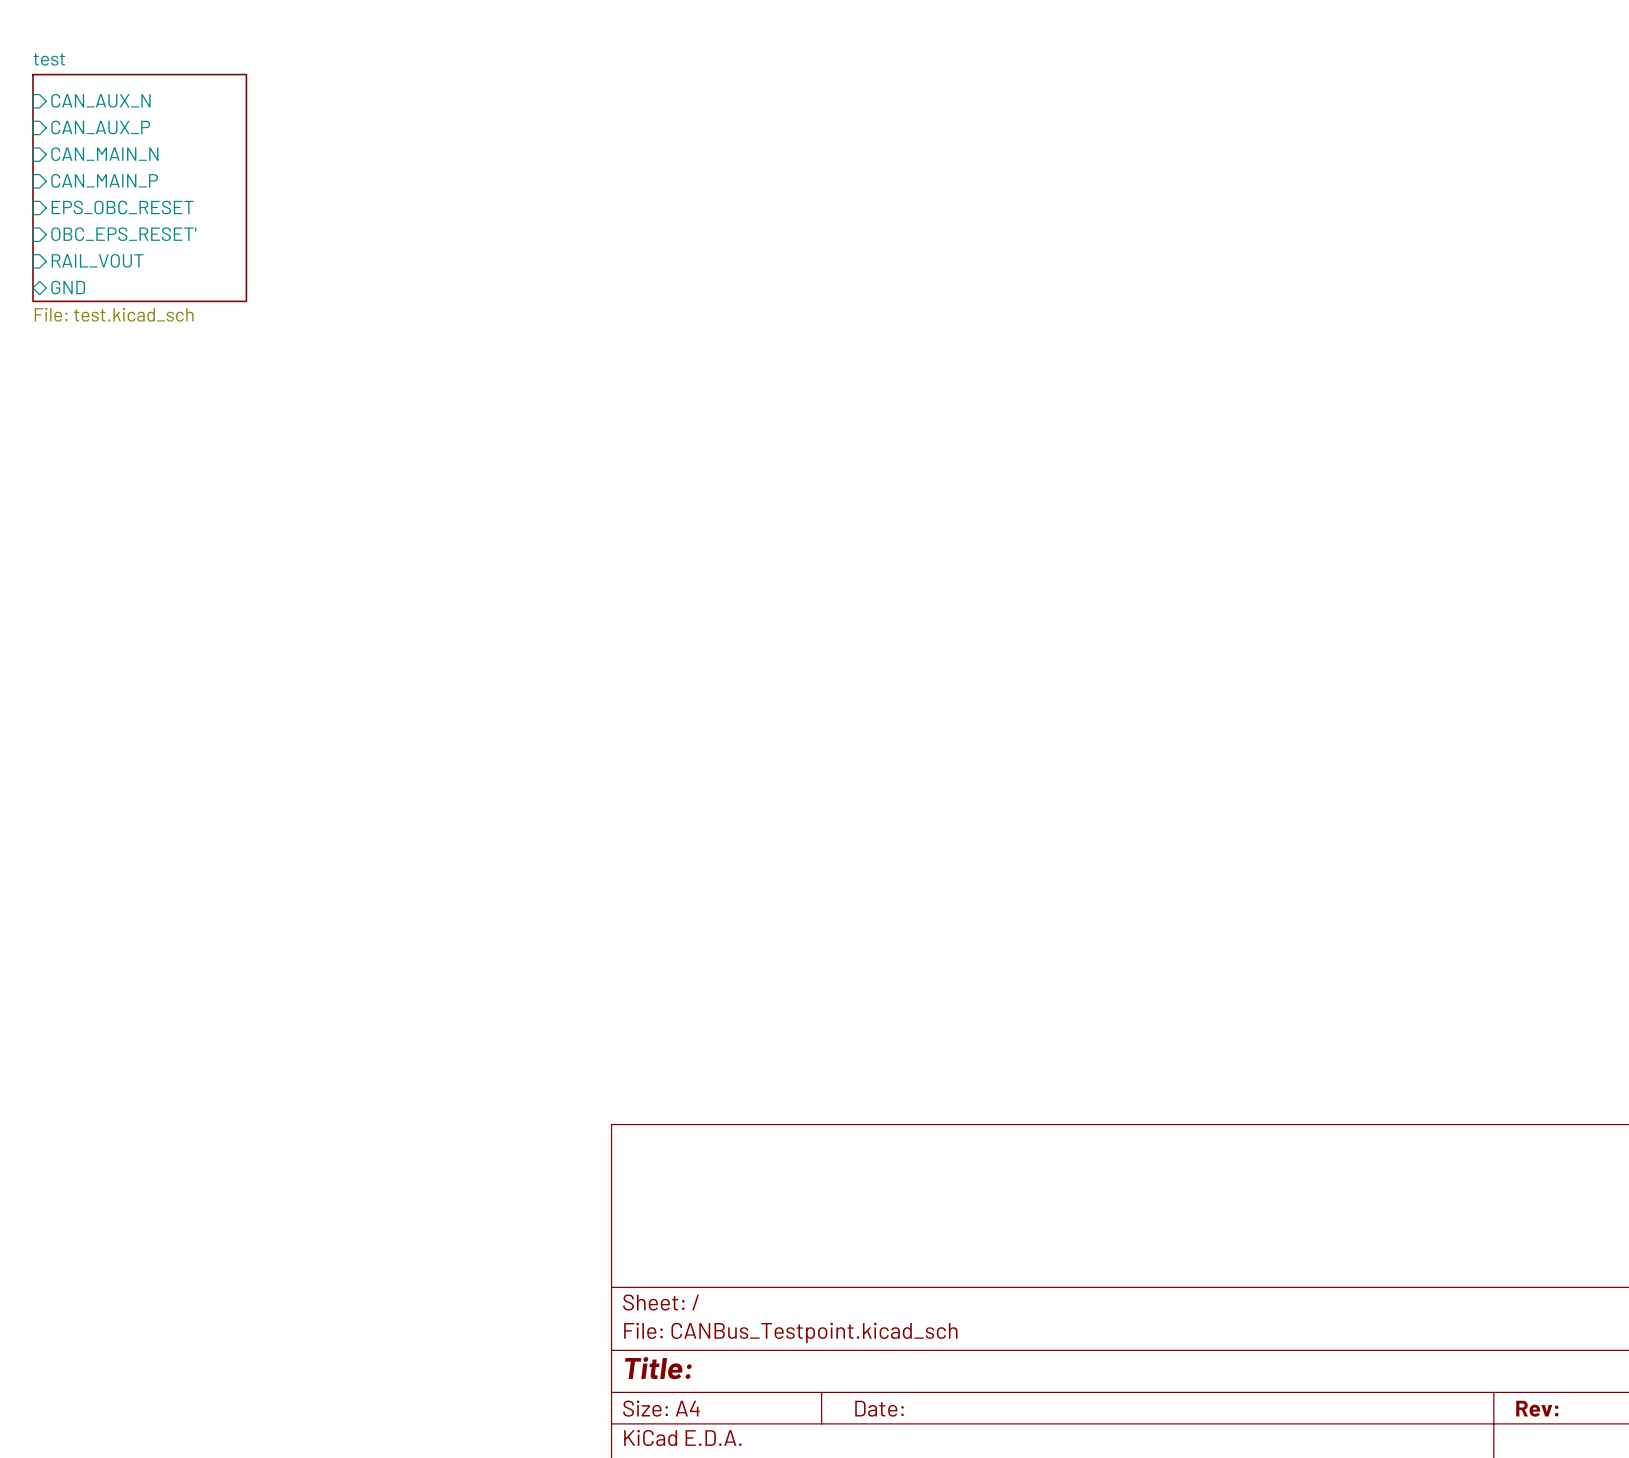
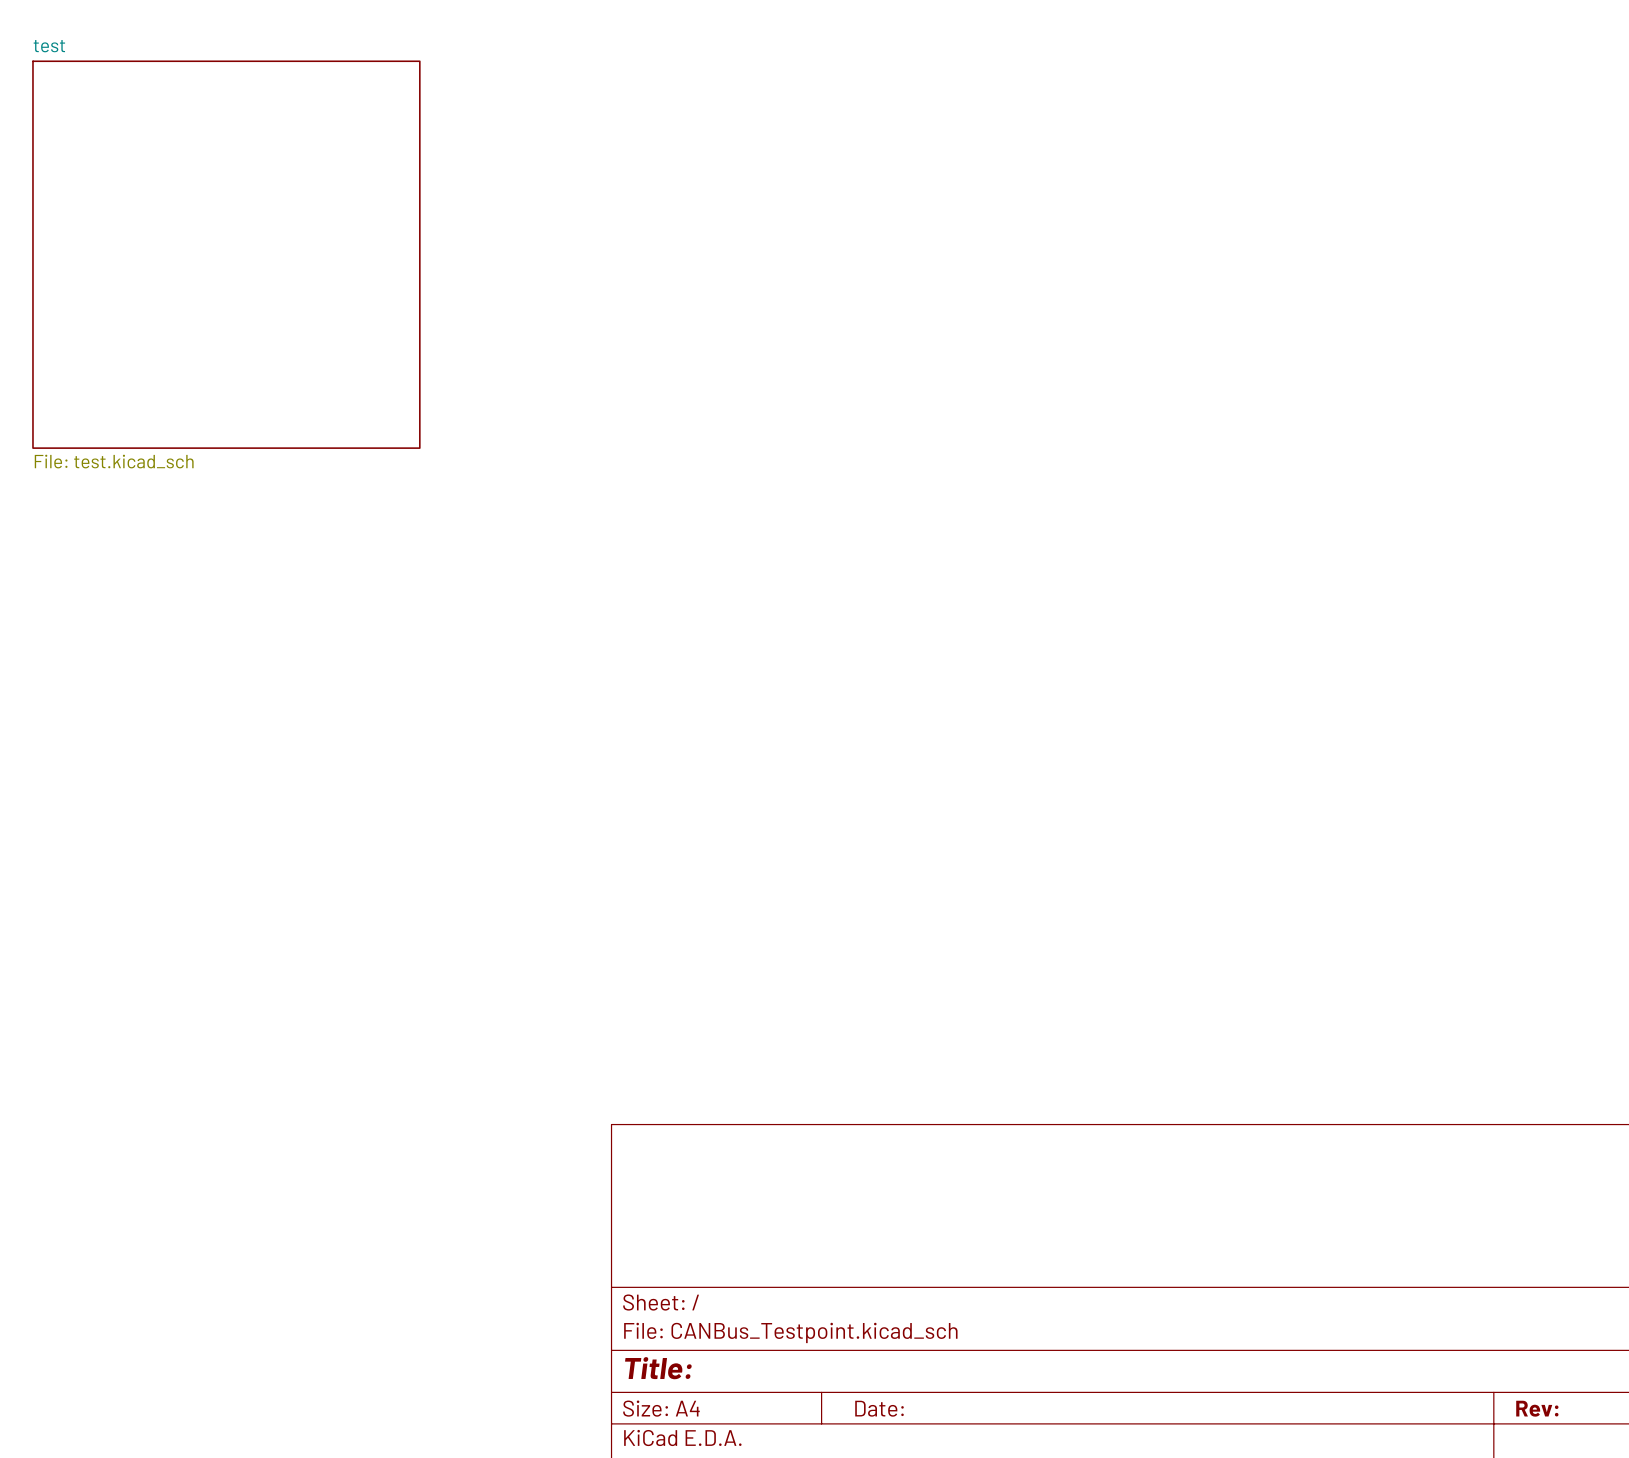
sheet pin: CAN_AUX_N (100, 100) -> none
sheet pin: CAN_AUX_P (100, 127) -> none
sheet pin: CAN_MAIN_N (104, 154) -> none
sheet pin: CAN_MAIN_P (104, 180) -> none
sheet test: File: test.kicad_sch (139, 187) -> none
sheet pin: EPS_OBC_RESET (122, 207) -> none
sheet pin: OBC_EPS_RESET' (123, 234) -> none
sheet test: none -> File: test.kicad_sch (226, 254)
sheet pin: RAIL_VOUT (97, 260) -> none
sheet pin: GND (68, 287) -> none

